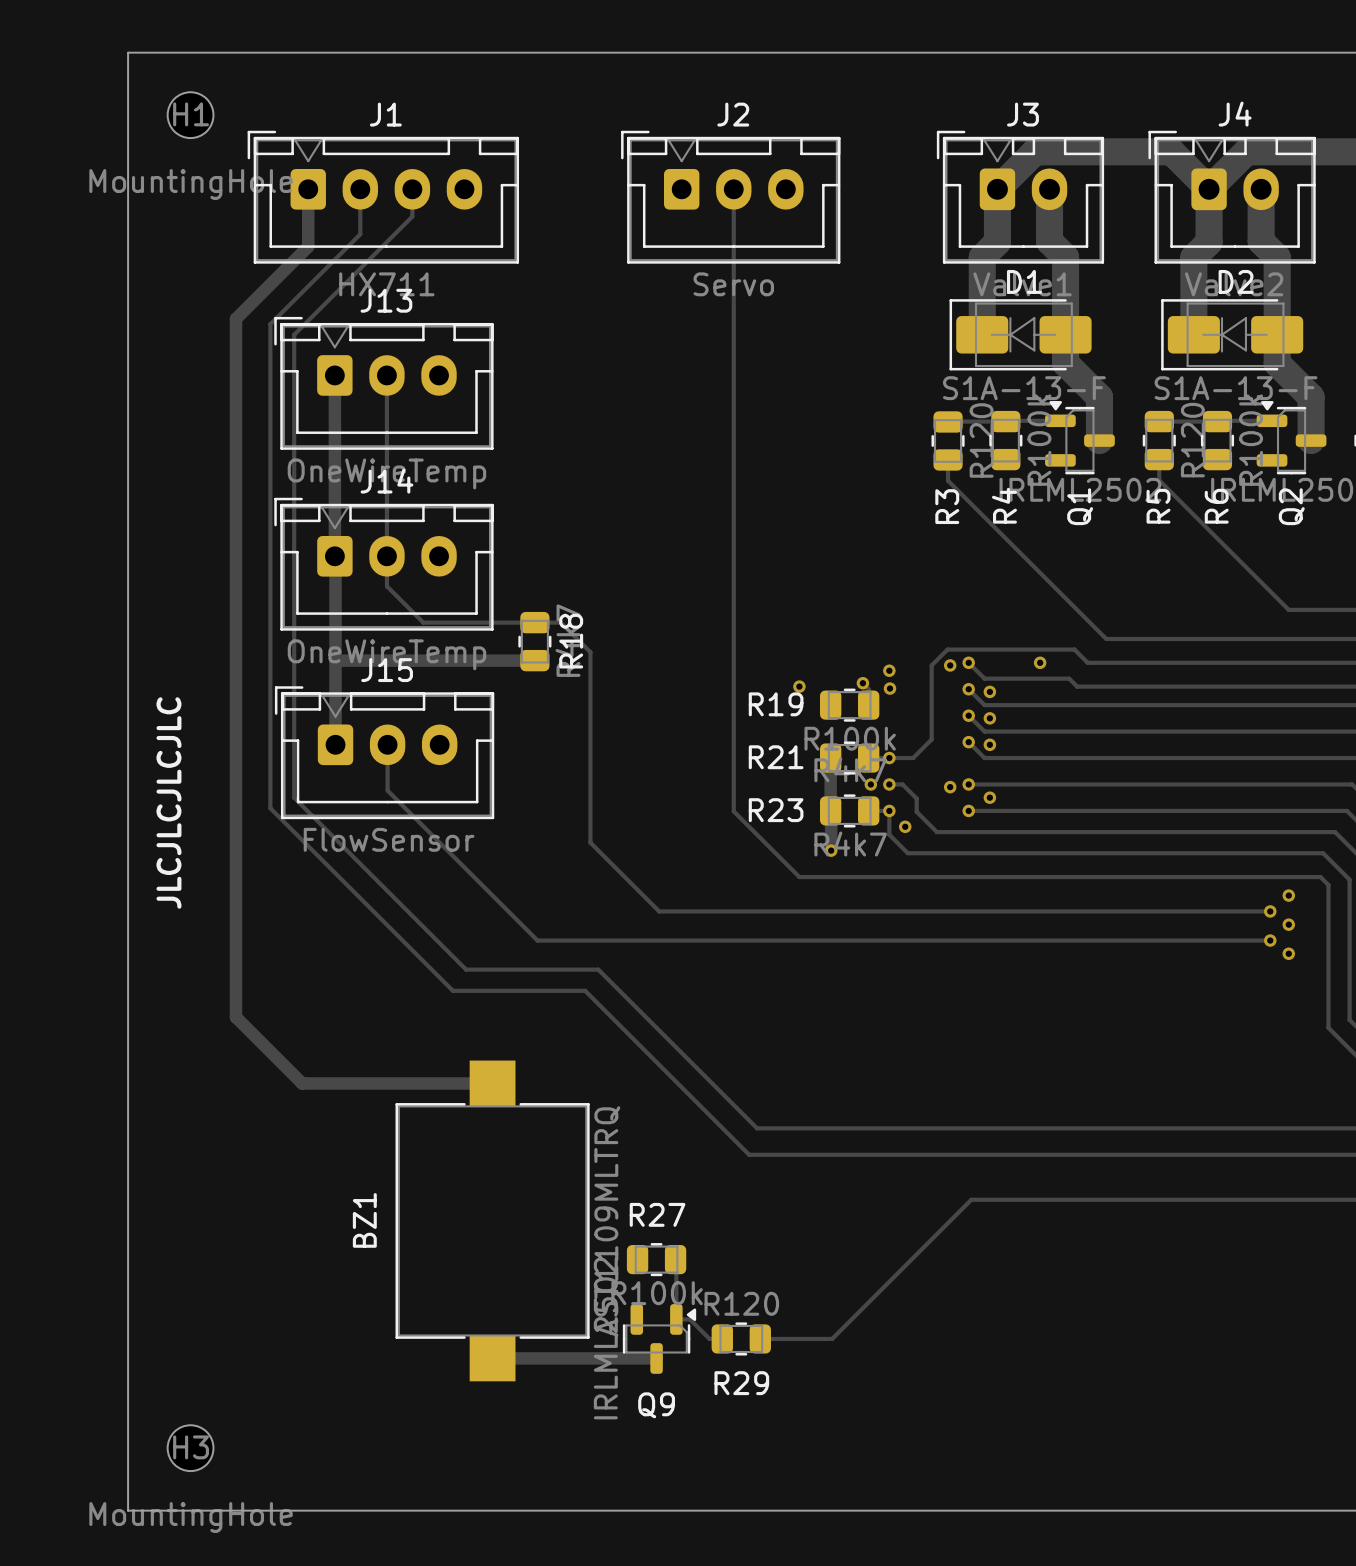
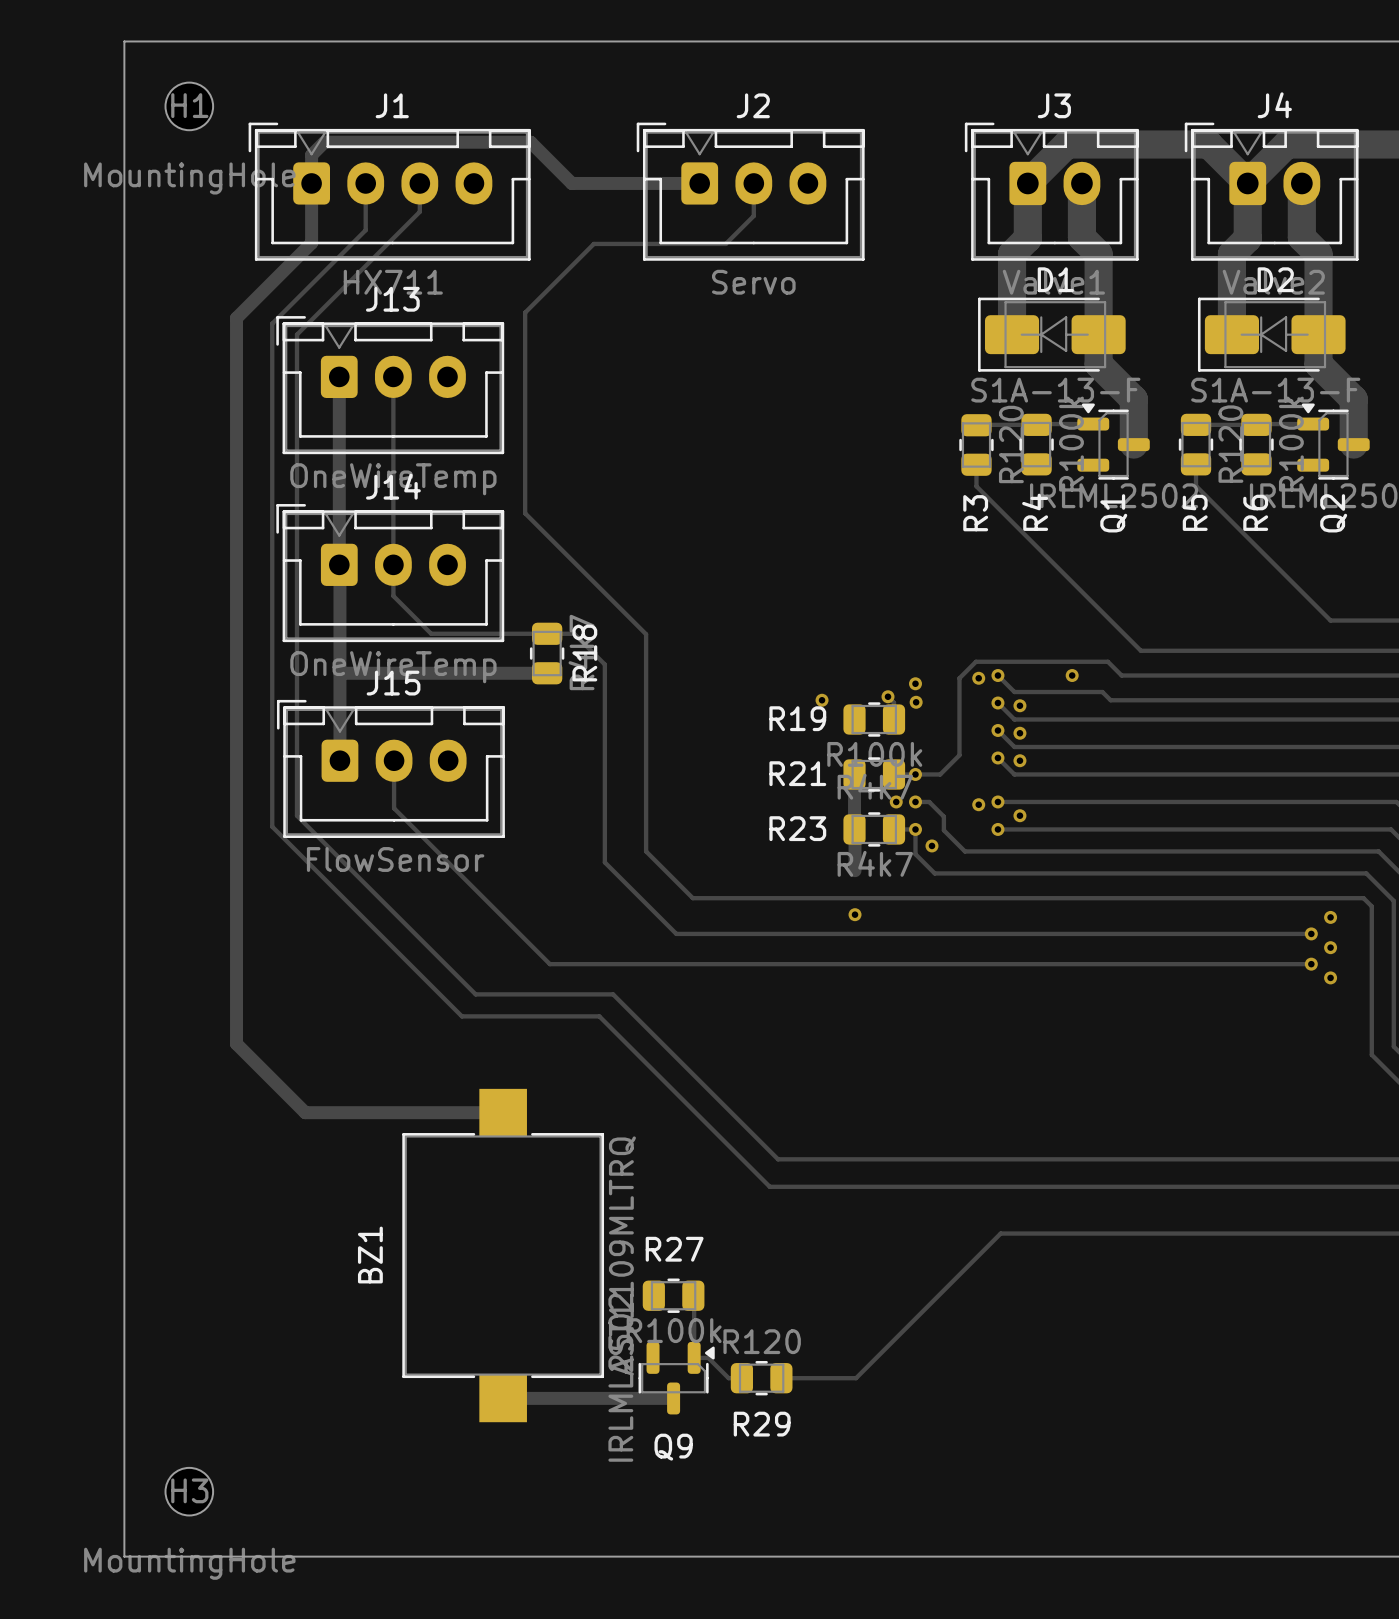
track: none -> (311, 183) (311, 155) (324, 142) (530, 142) (571, 183) (699, 183)
track: (733, 220) (733, 811) (799, 877) -> (753, 215) (725, 243) (593, 243) (525, 312) (525, 513) (646, 634) (646, 851) (692, 898) (822, 898)
text: JLCJLCJLCJLC (168, 802) -> none
via position: (831, 850) -> (855, 914)

